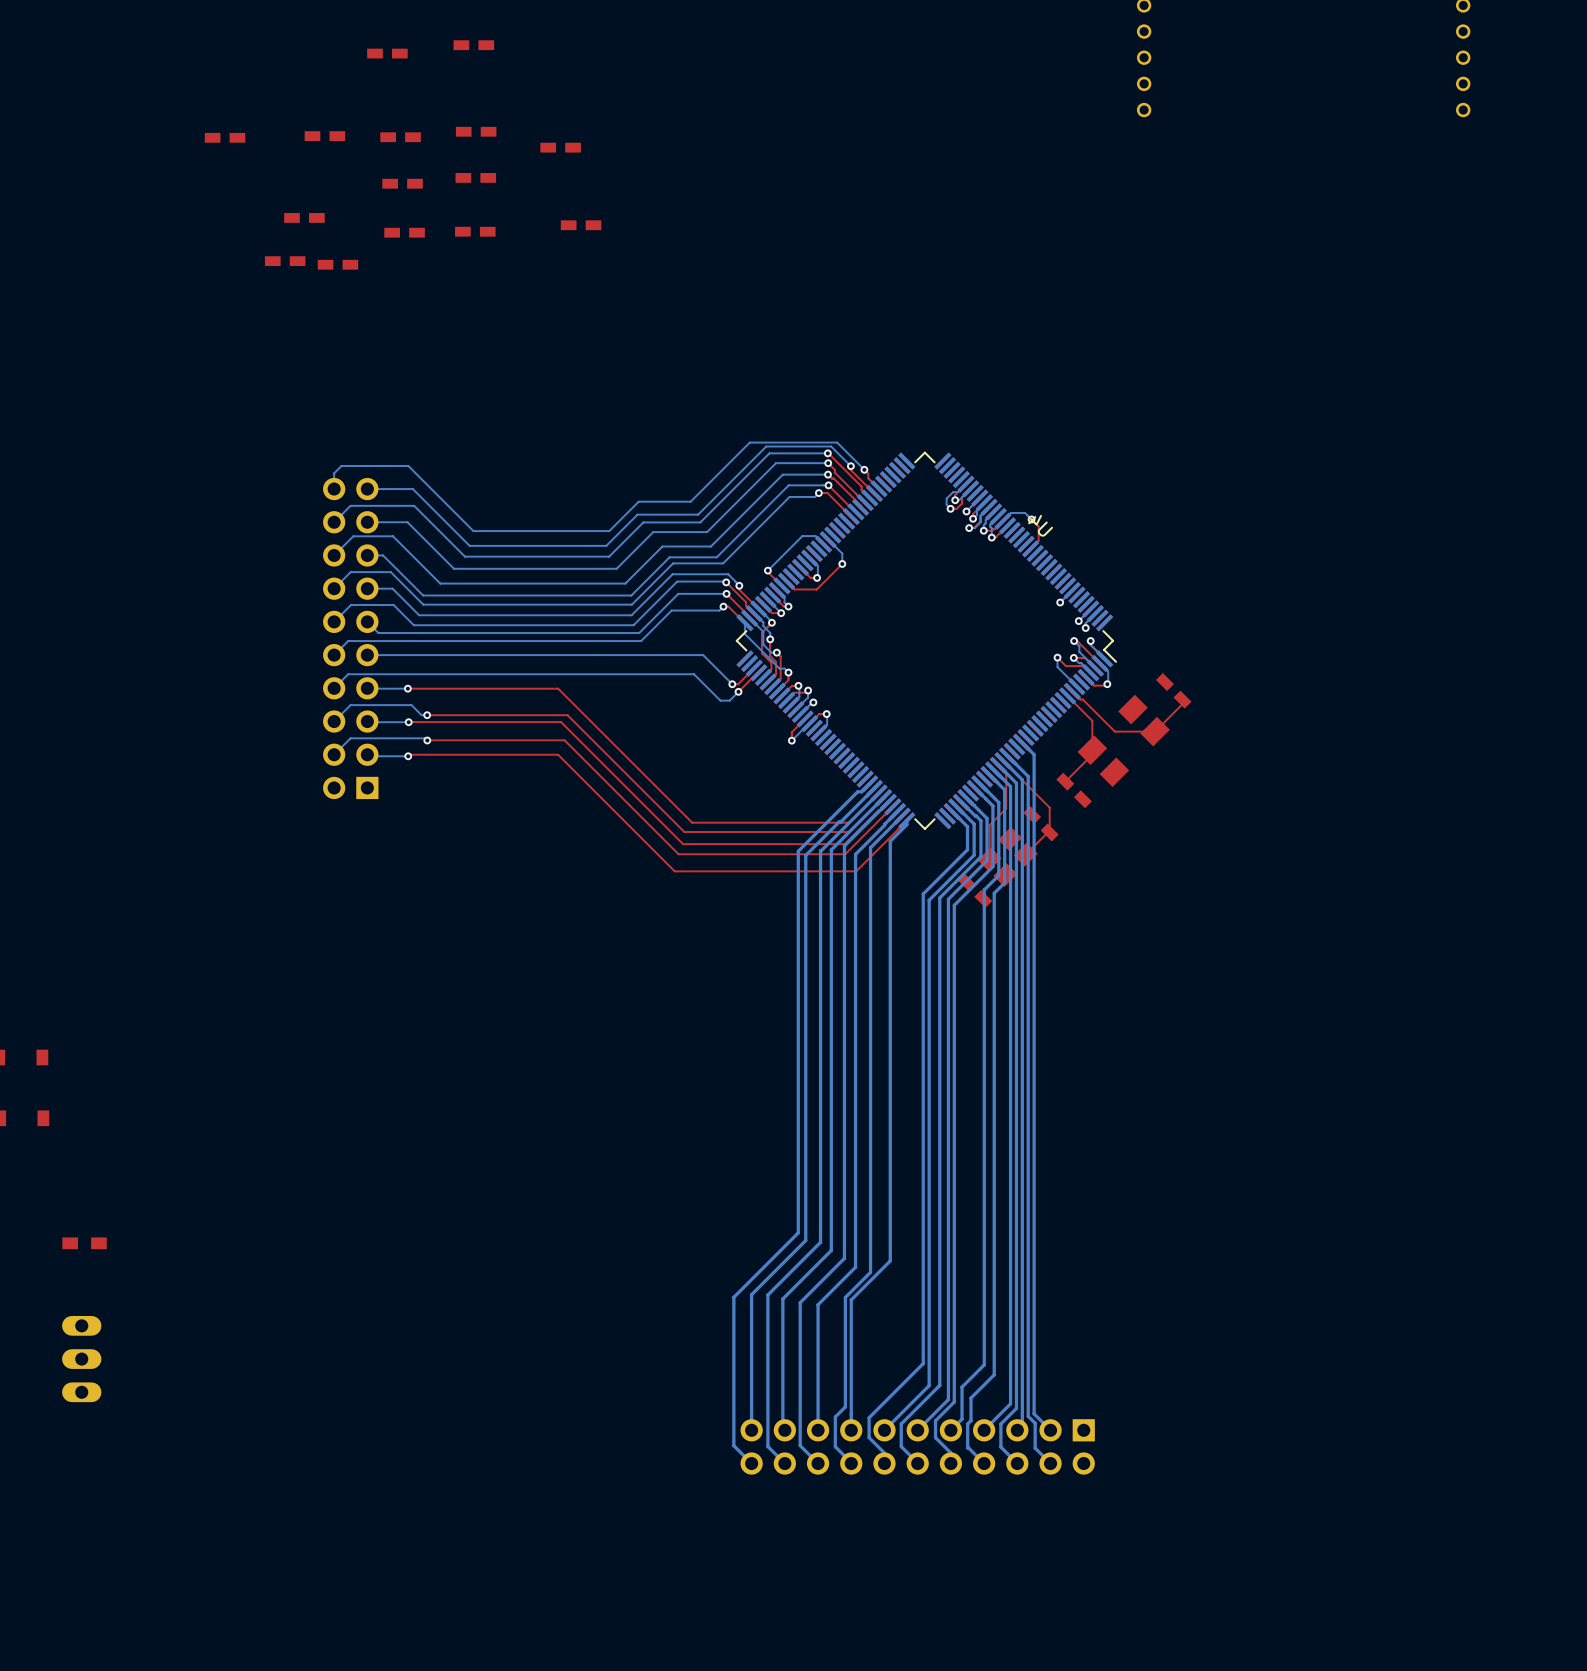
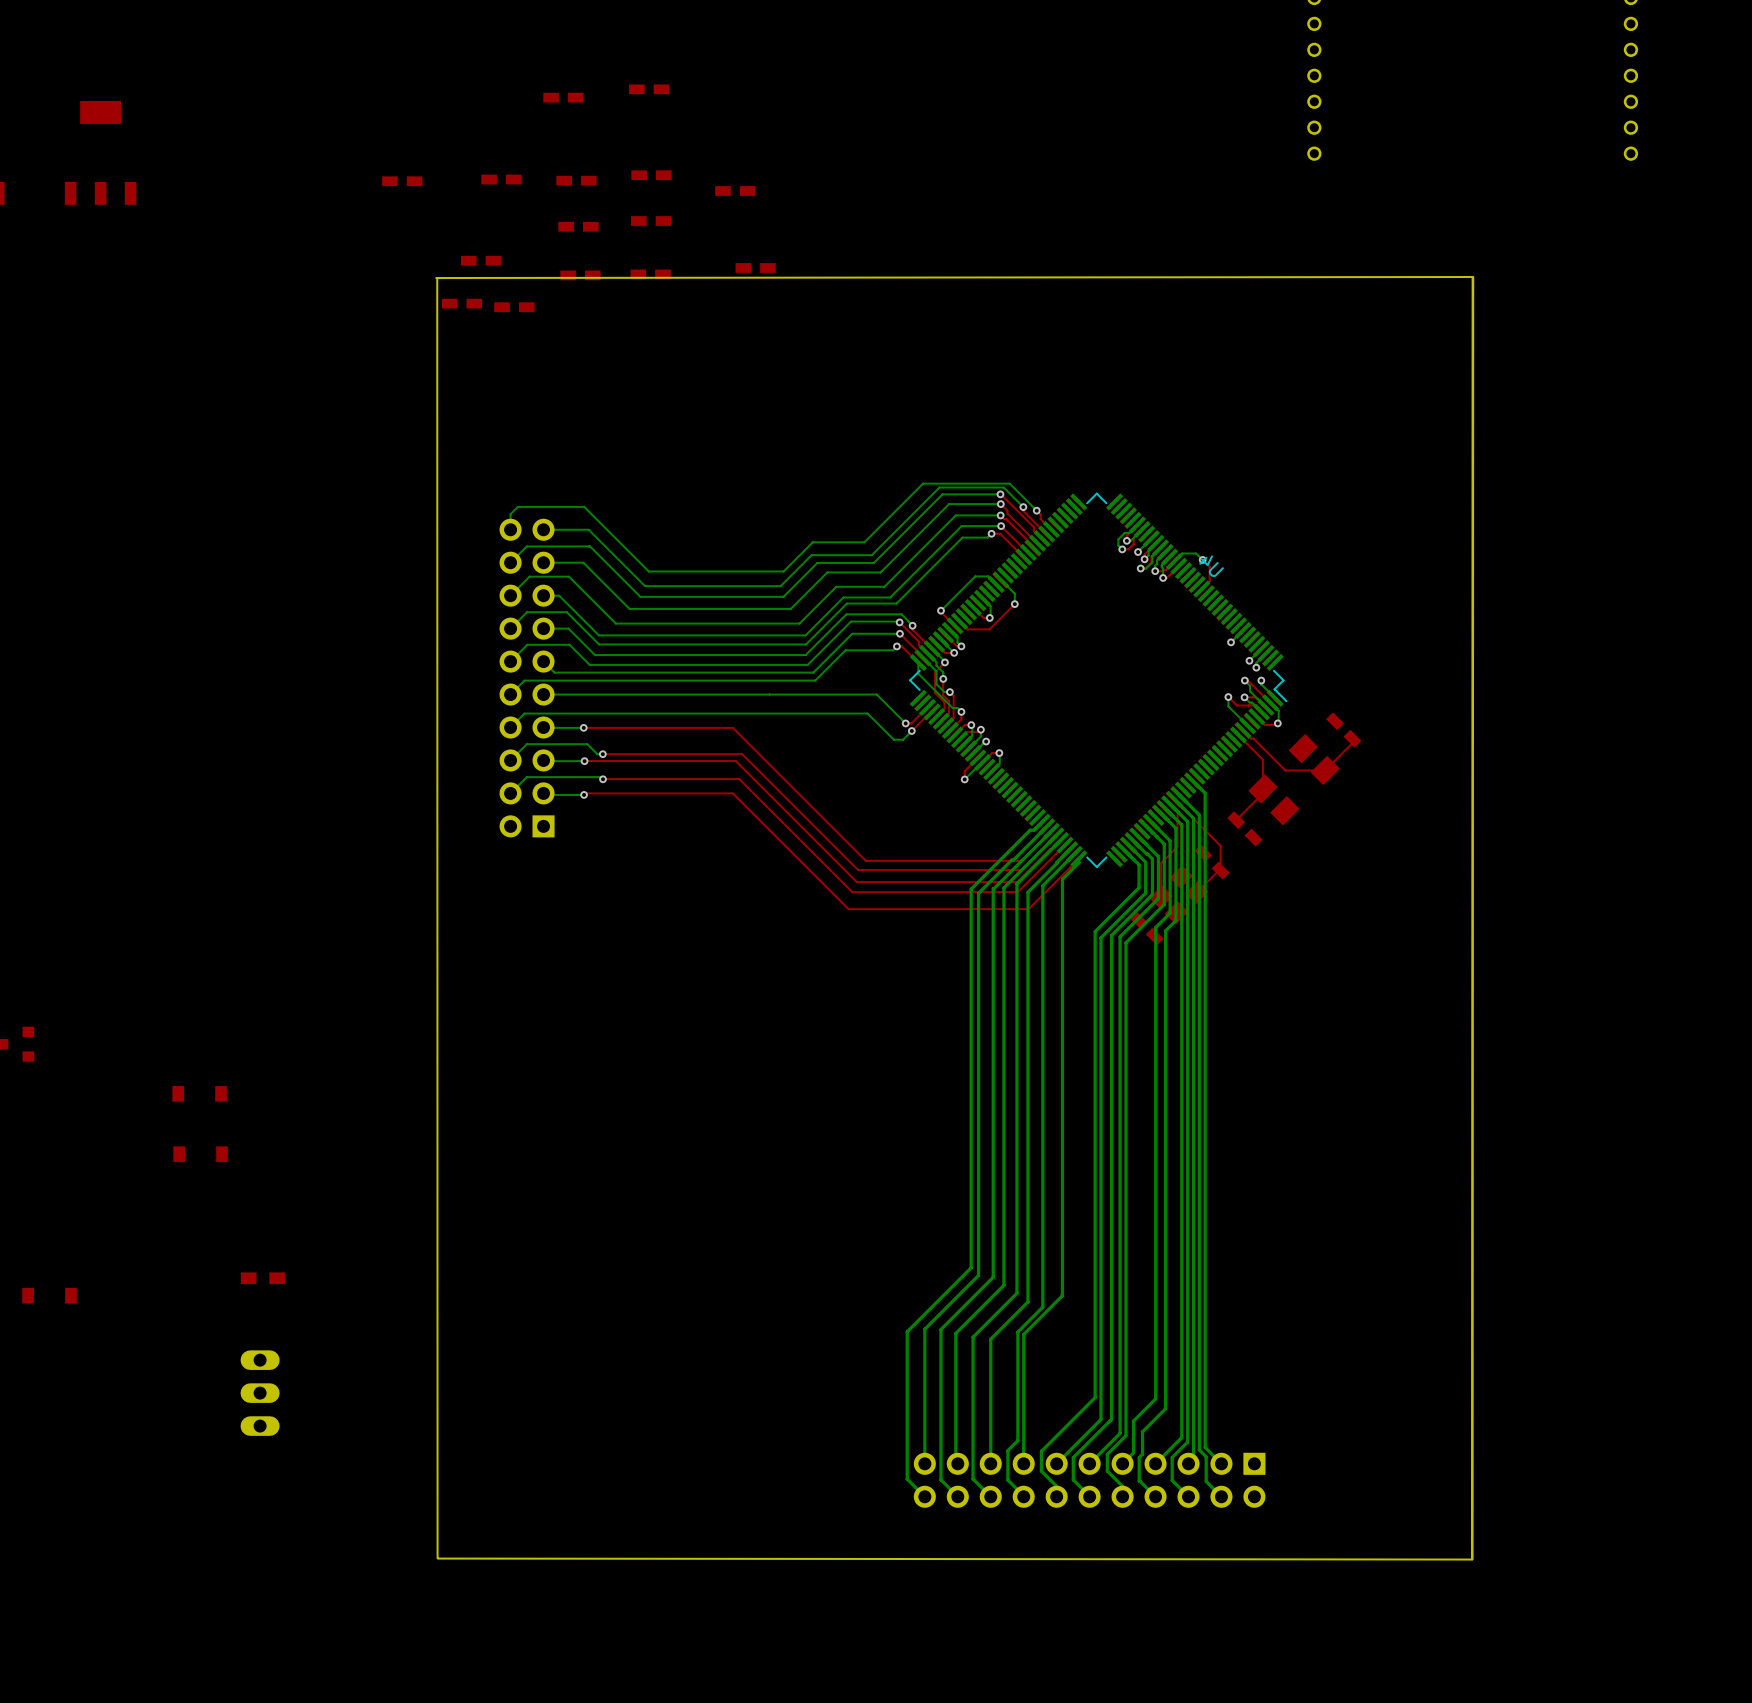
board edge: none -> (1472, 277) (1472, 1559)
board edge: none -> (1473, 277) (436, 278)
board edge: none -> (437, 278) (437, 1558)
board edge: none -> (437, 1558) (1471, 1559)

